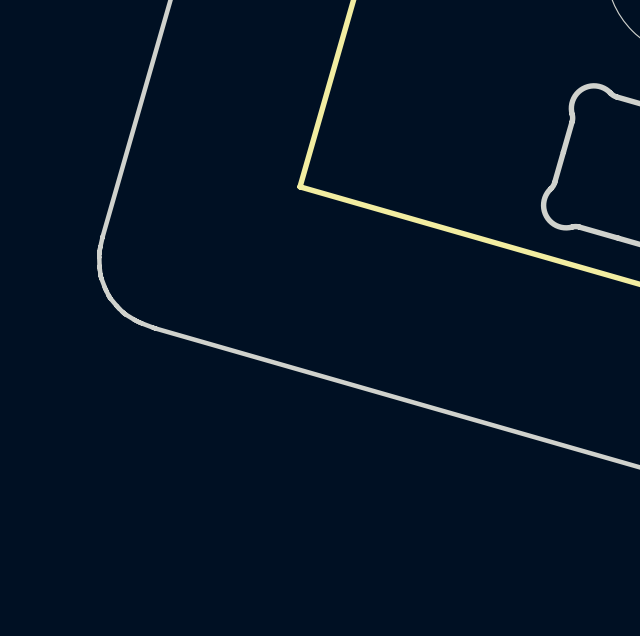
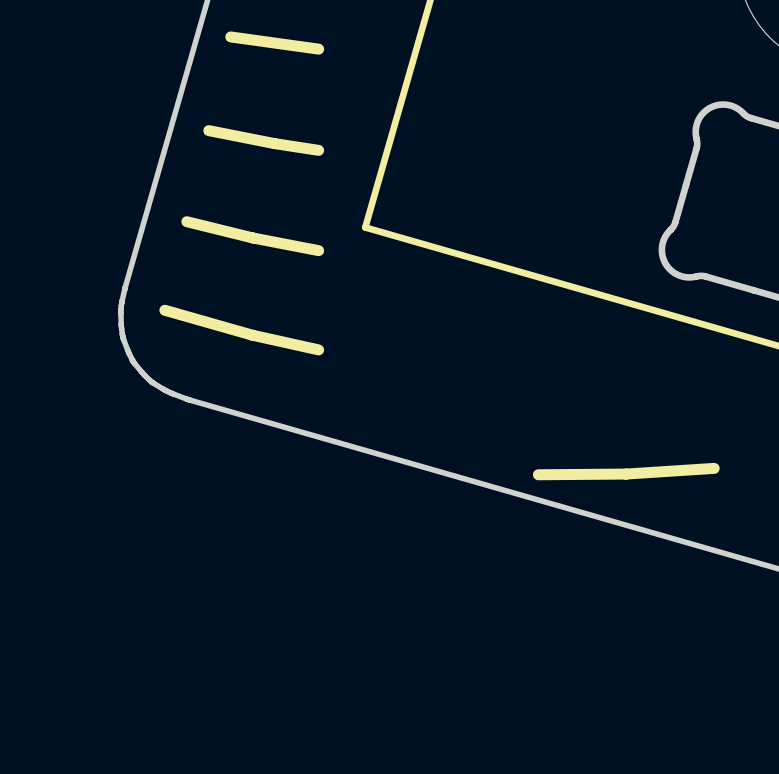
line: none -> (230, 36) (318, 49)
line: none -> (208, 130) (318, 150)
line: none -> (186, 221) (252, 237) (318, 250)
line: none -> (164, 310) (252, 335) (318, 349)
line: none -> (714, 468) (626, 474) (538, 474)

